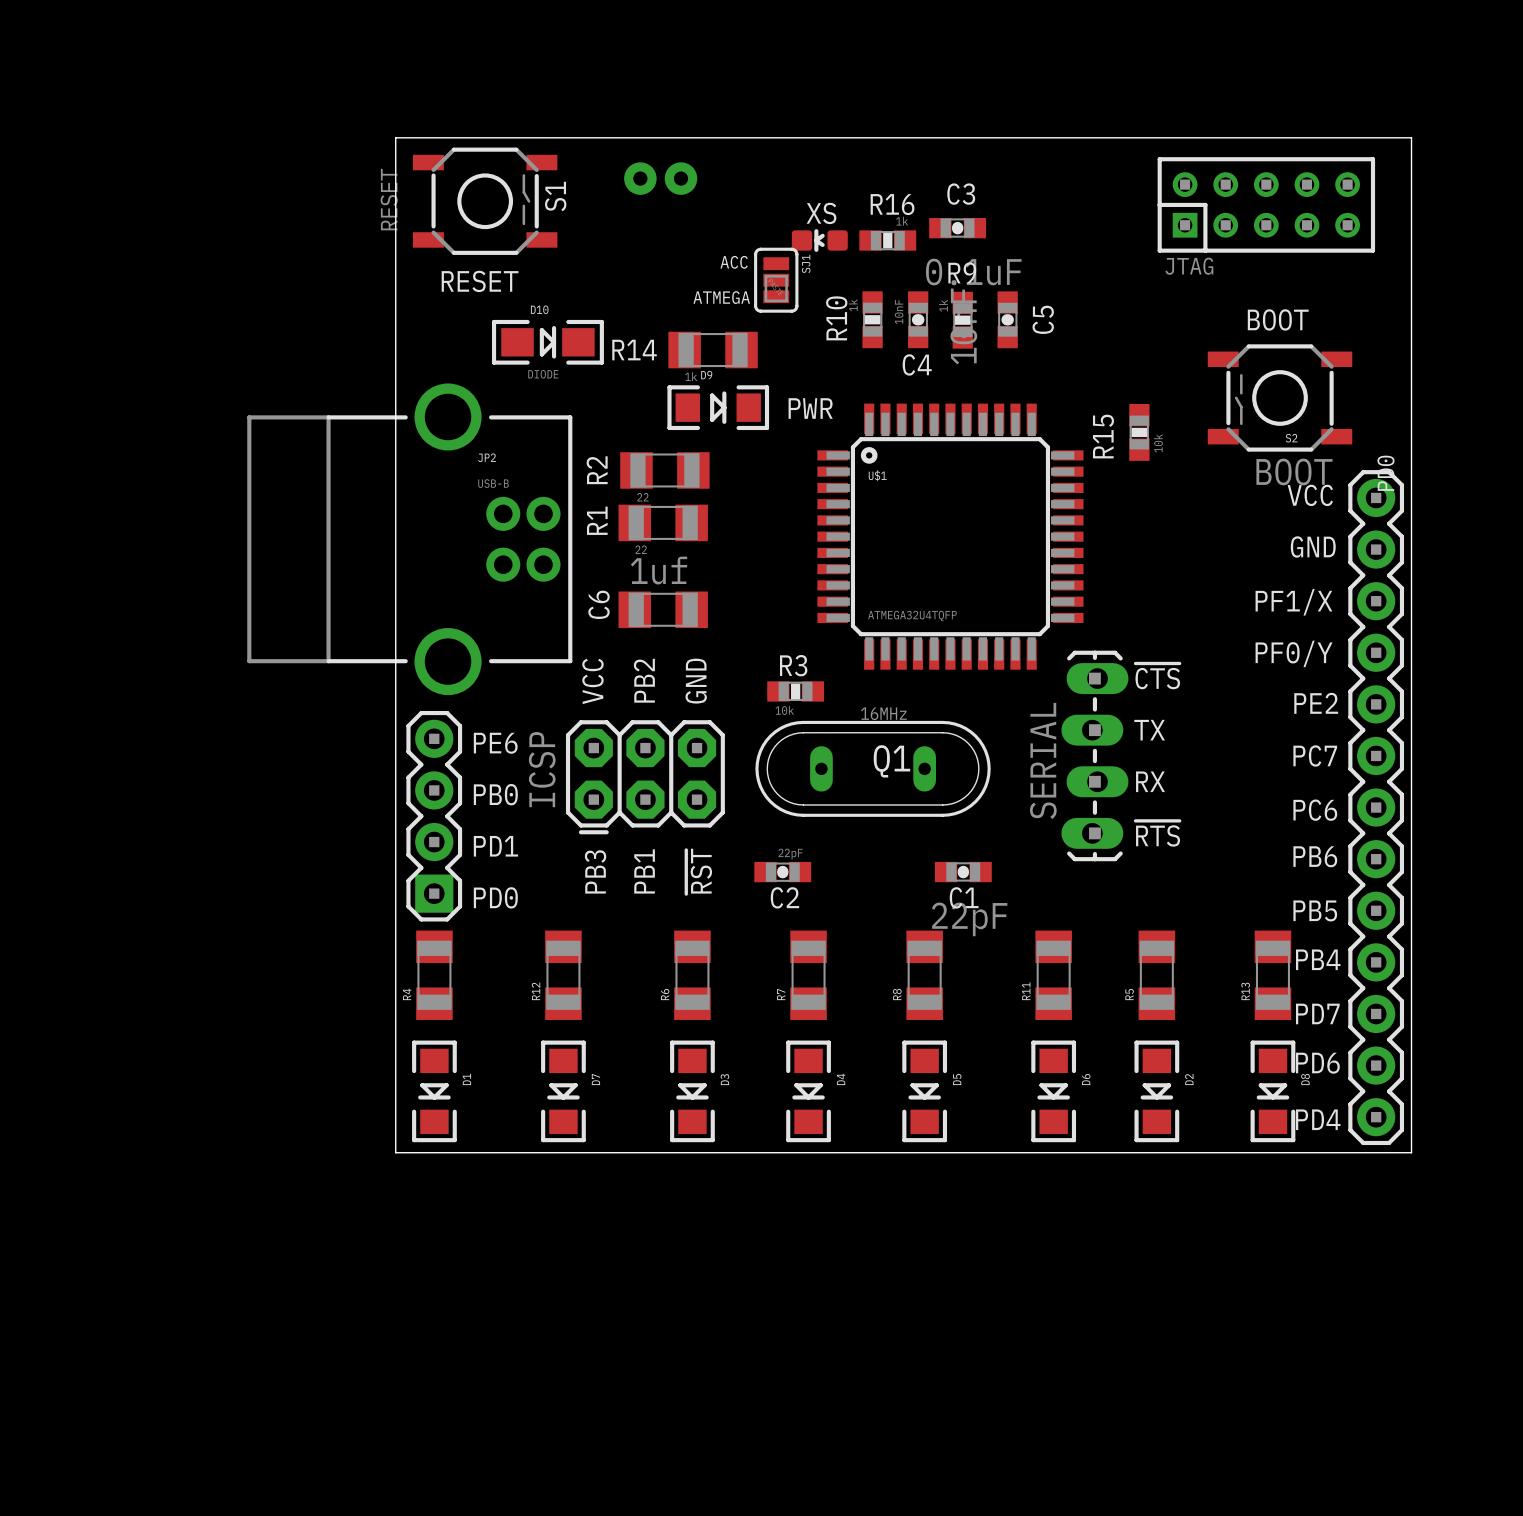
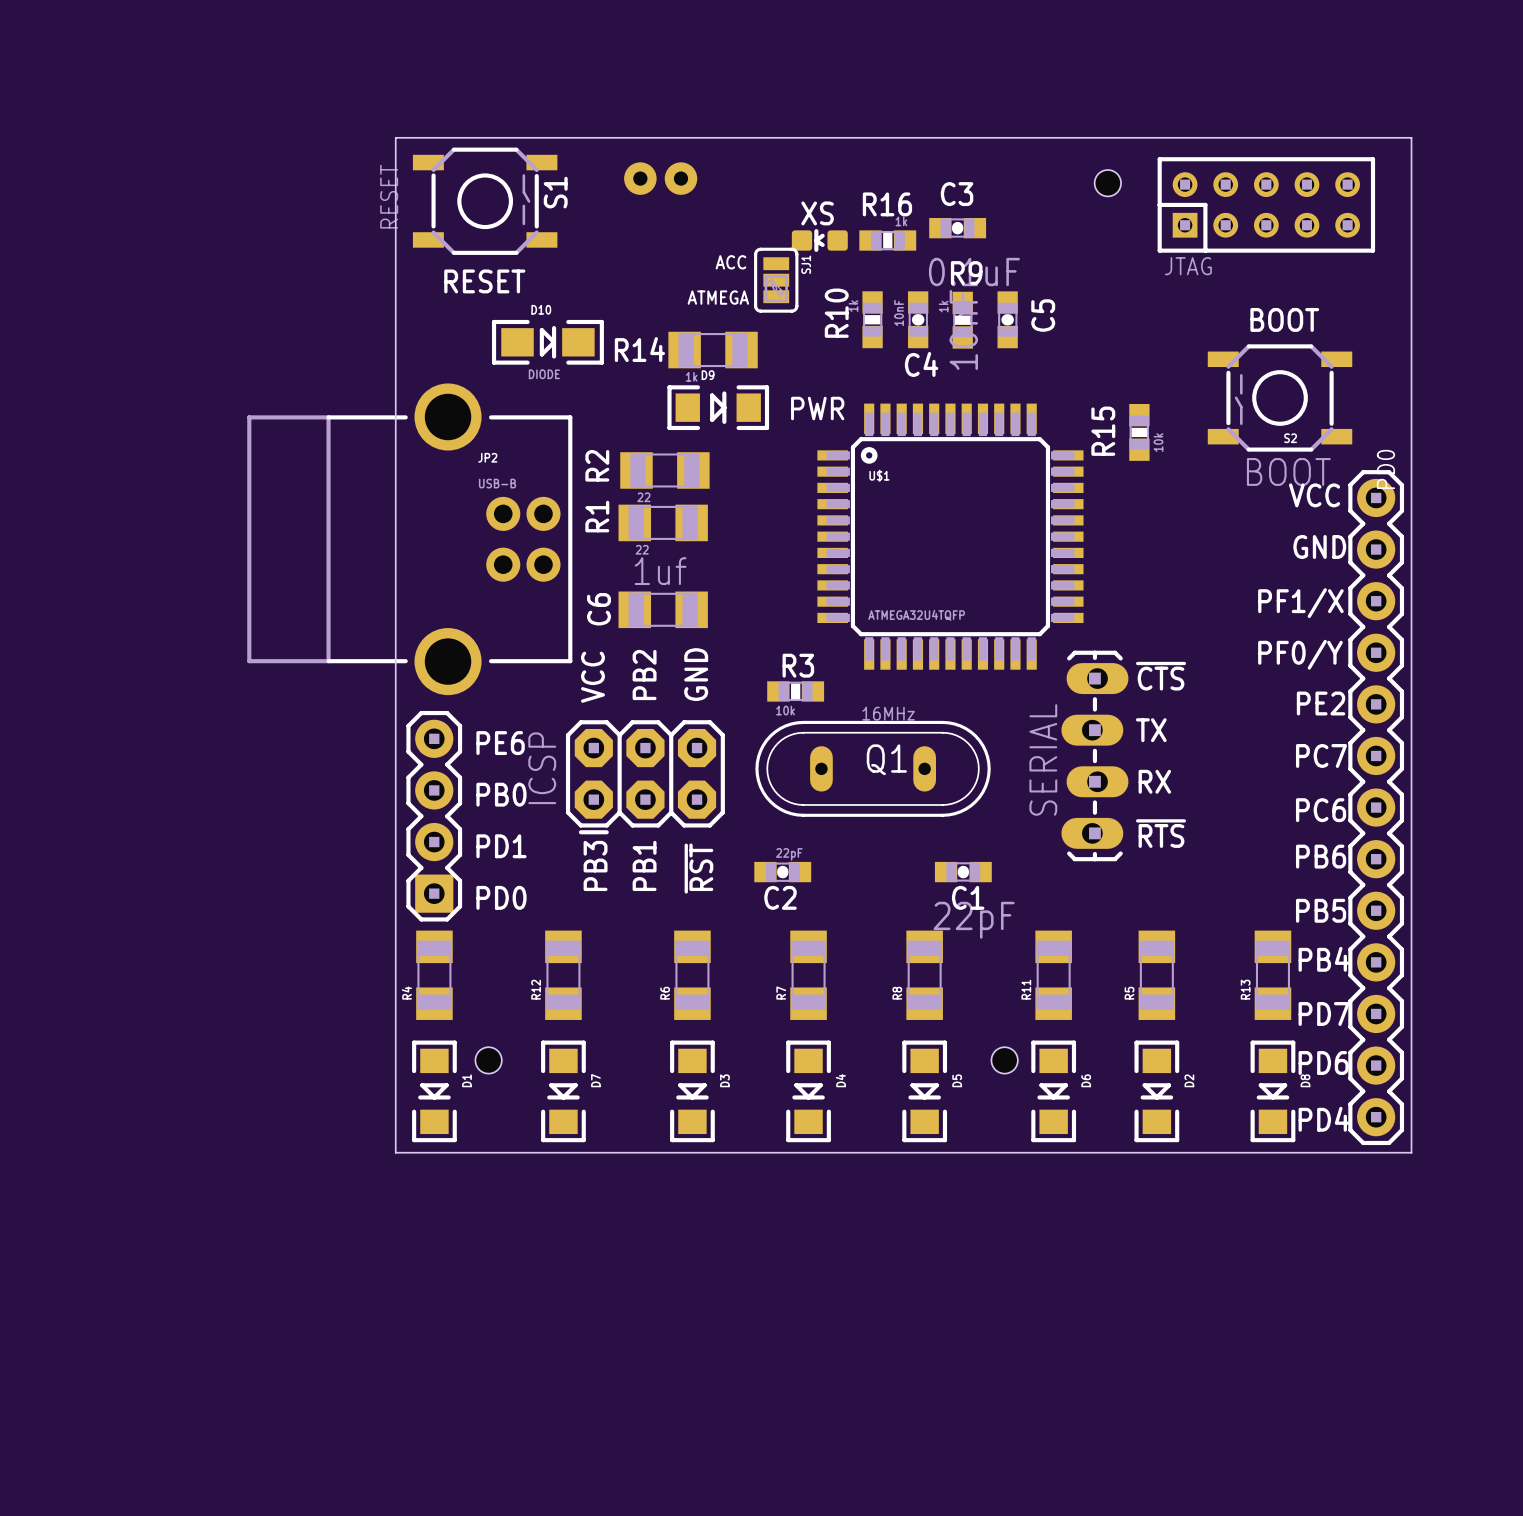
hole: none -> (1107, 183)
hole: none -> (488, 1060)
hole: none -> (1004, 1060)

